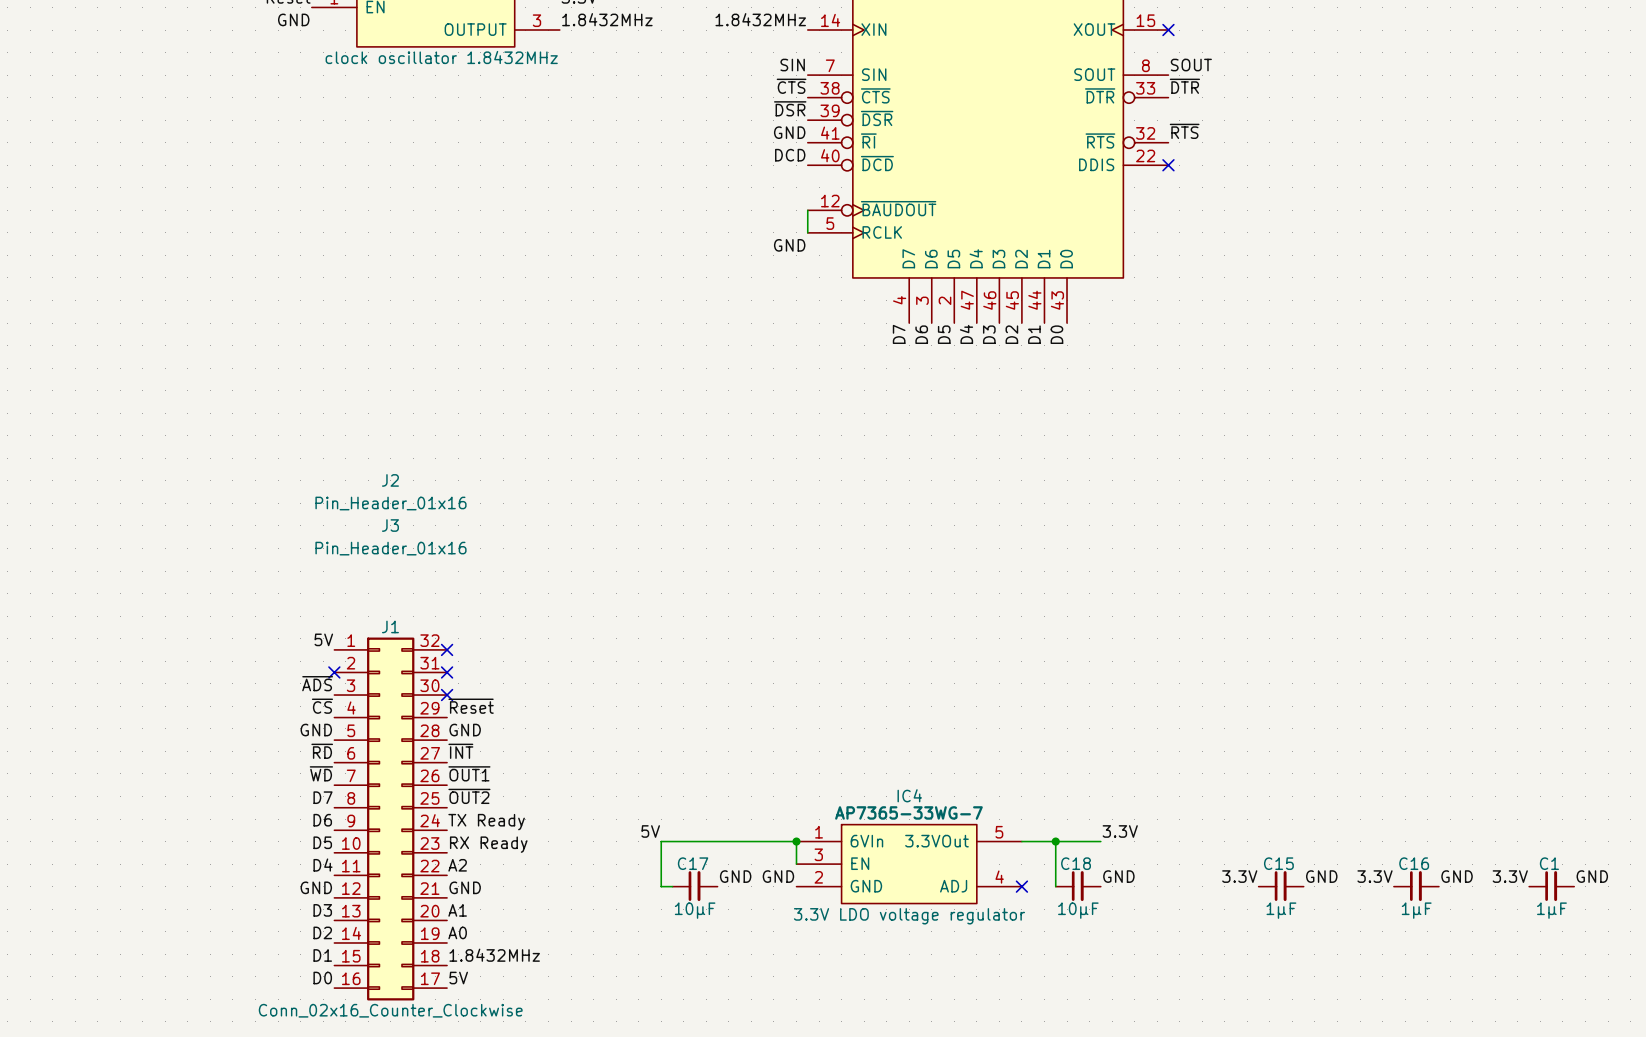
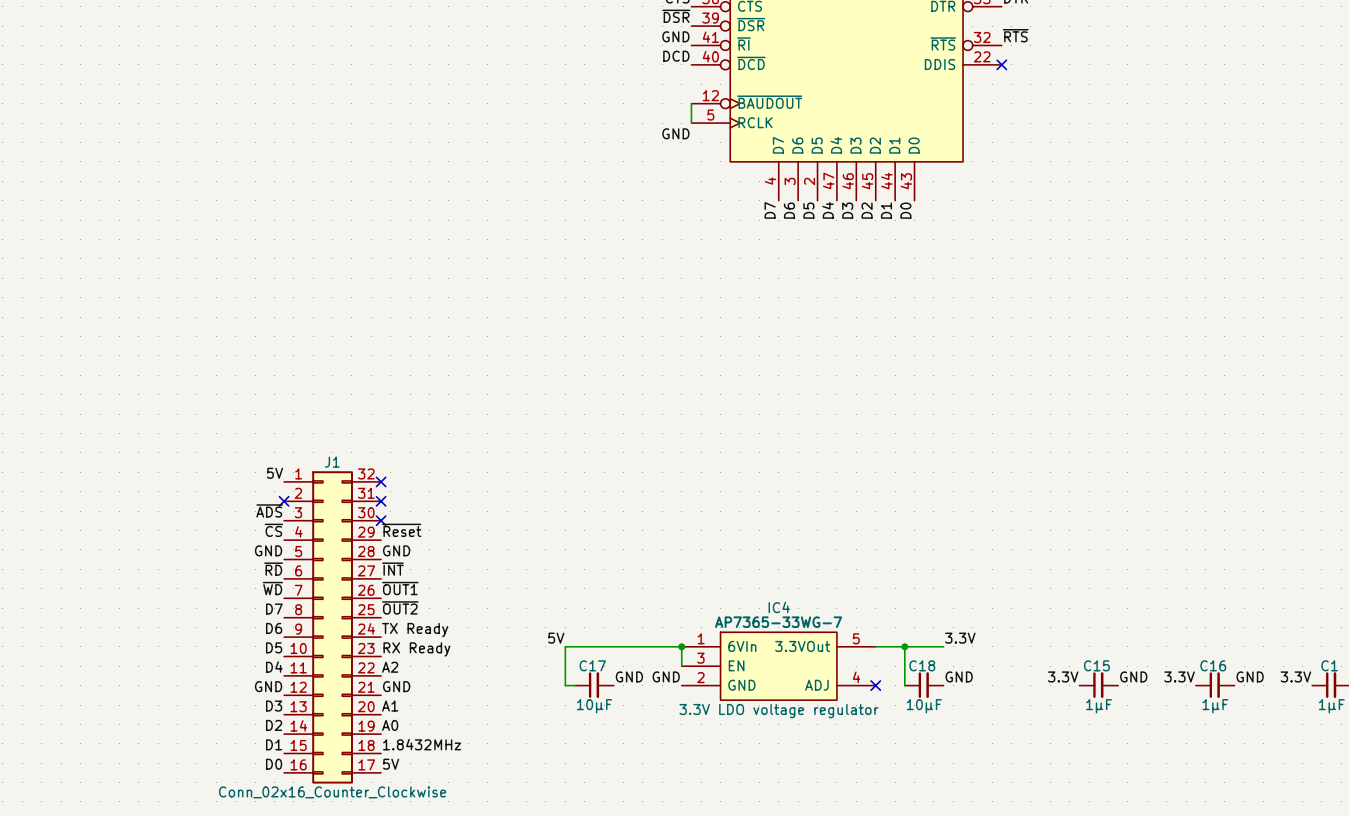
J2: Pin_Header_01x16 (390, 492) -> none
J3: Pin_Header_01x16 (390, 537) -> none

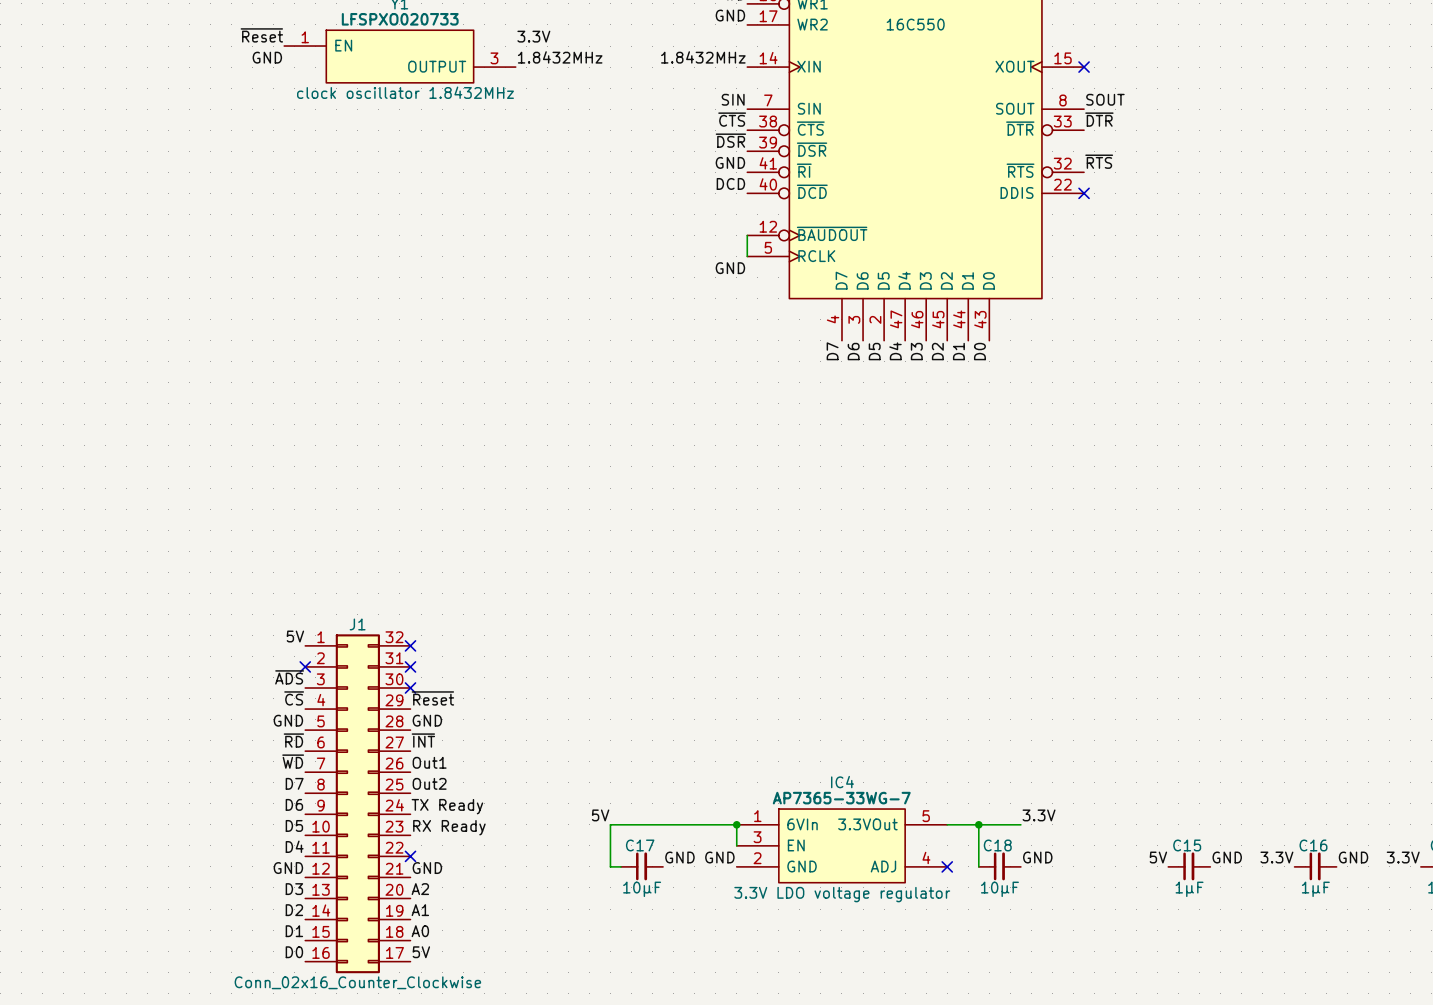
label: ~{OUT1} (400, 588) -> Out1 (429, 762)
label: ~{OUT2} (400, 607) -> Out2 (429, 783)
label: A2 (390, 667) -> none
no-connect mark: none -> (410, 856)
label: 3.3V (1063, 676) -> 5V (1158, 857)
label: A1 (390, 706) -> A2 (420, 889)
label: A0 (390, 725) -> A1 (420, 910)
label: 1.8432MHz (422, 744) -> A0 (420, 931)

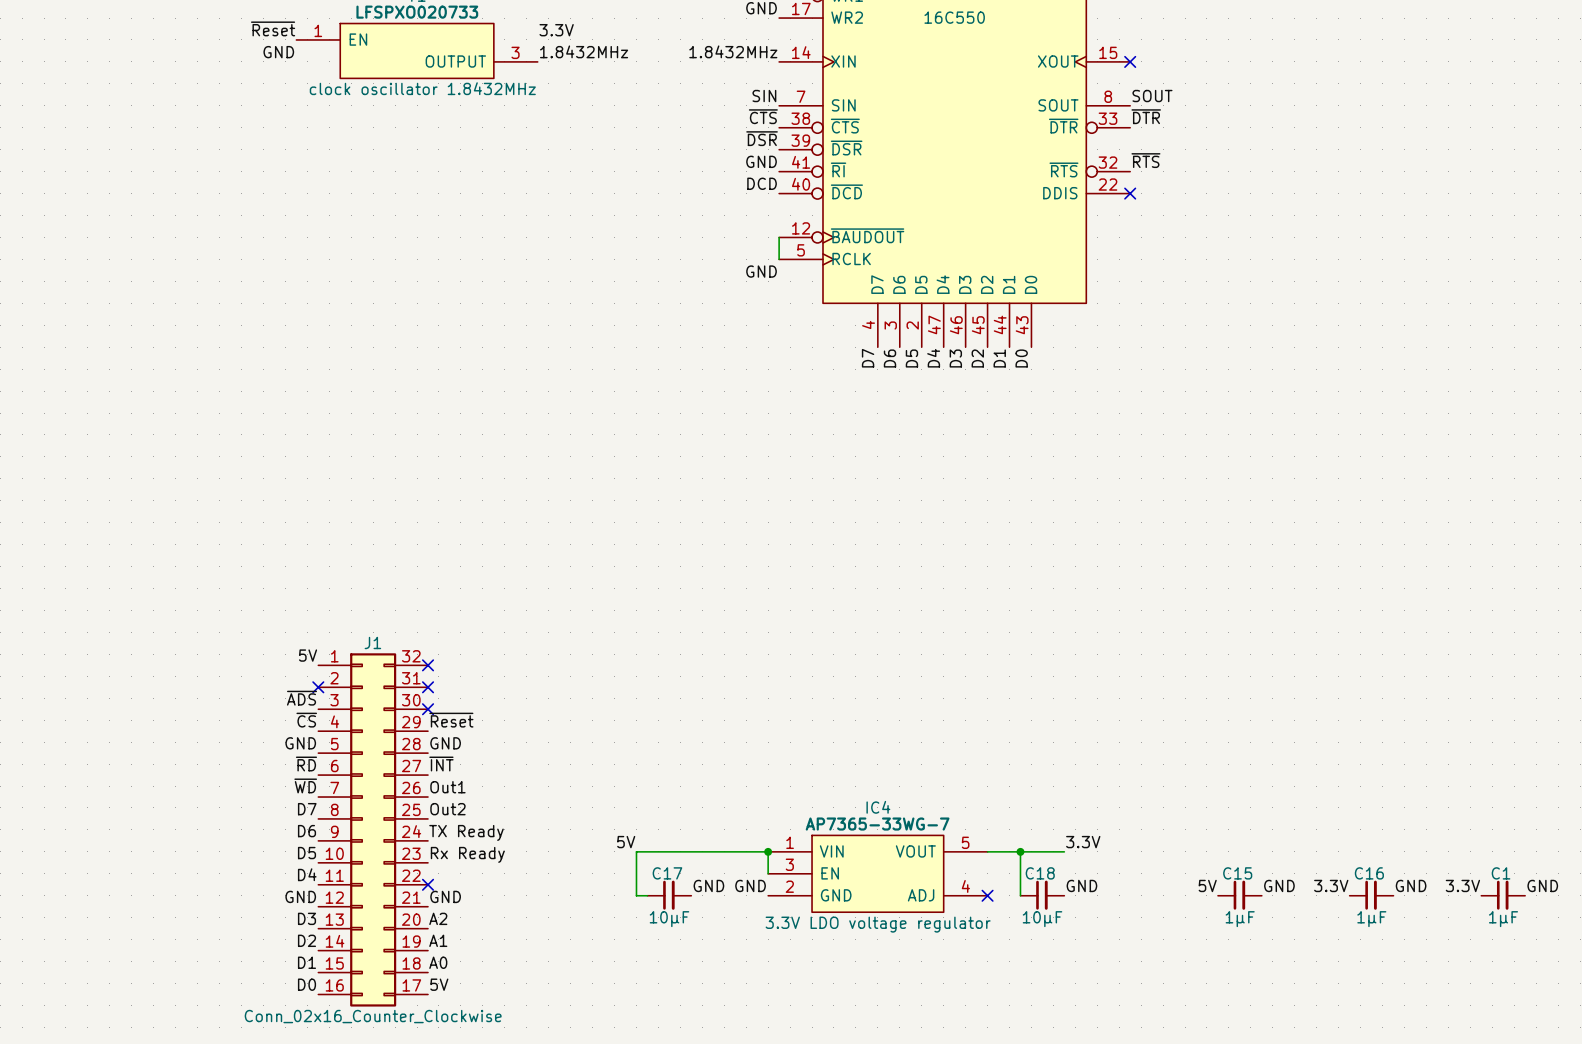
IC4 pin name: 6VIn (802, 824) -> VIN (831, 851)
IC4 pin name: 3.3VOut (867, 824) -> VOUT (915, 851)
label: RX Ready (449, 827) -> Rx Ready (467, 854)

